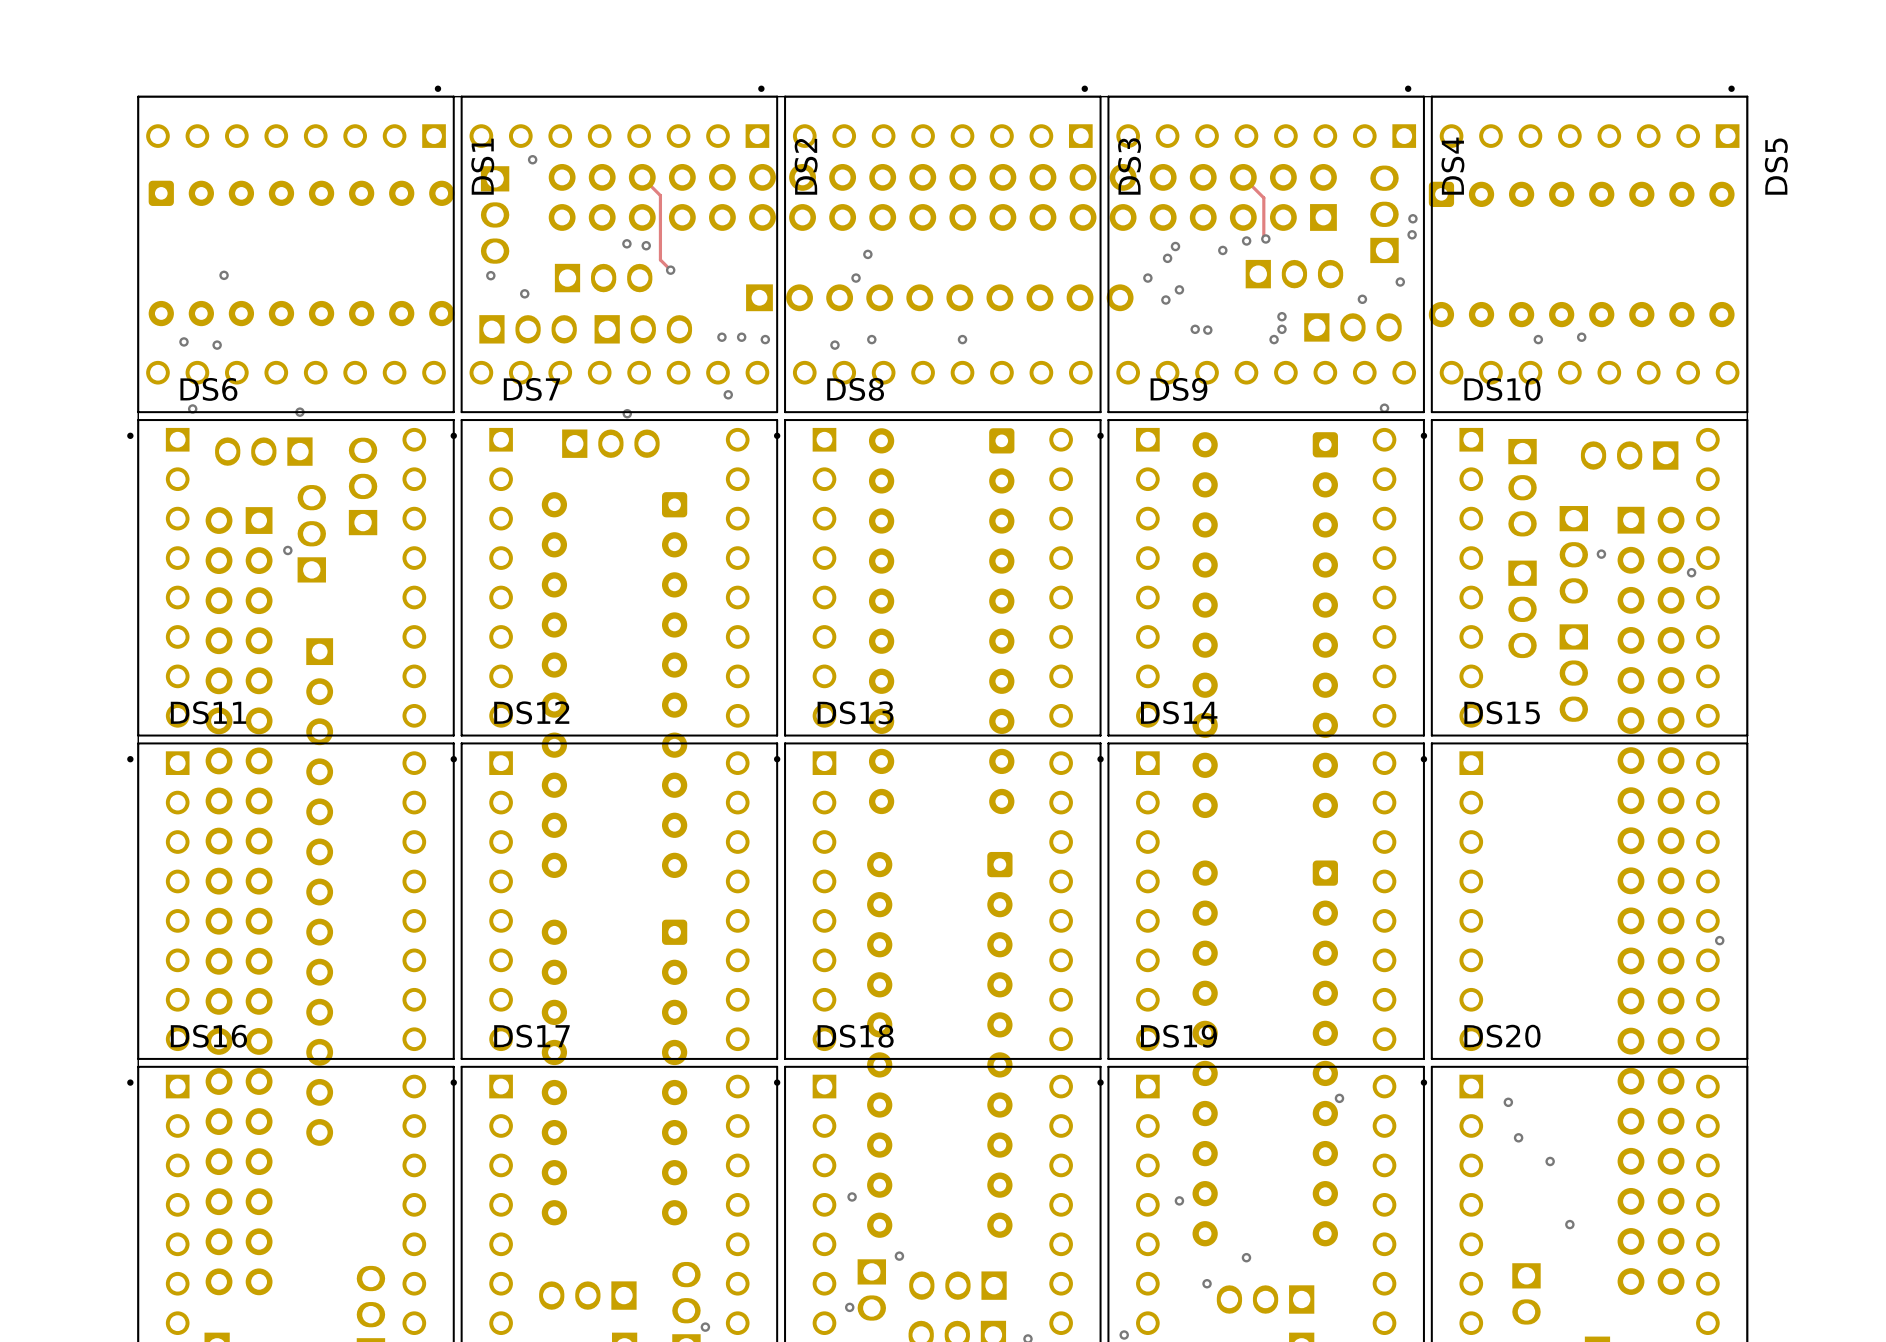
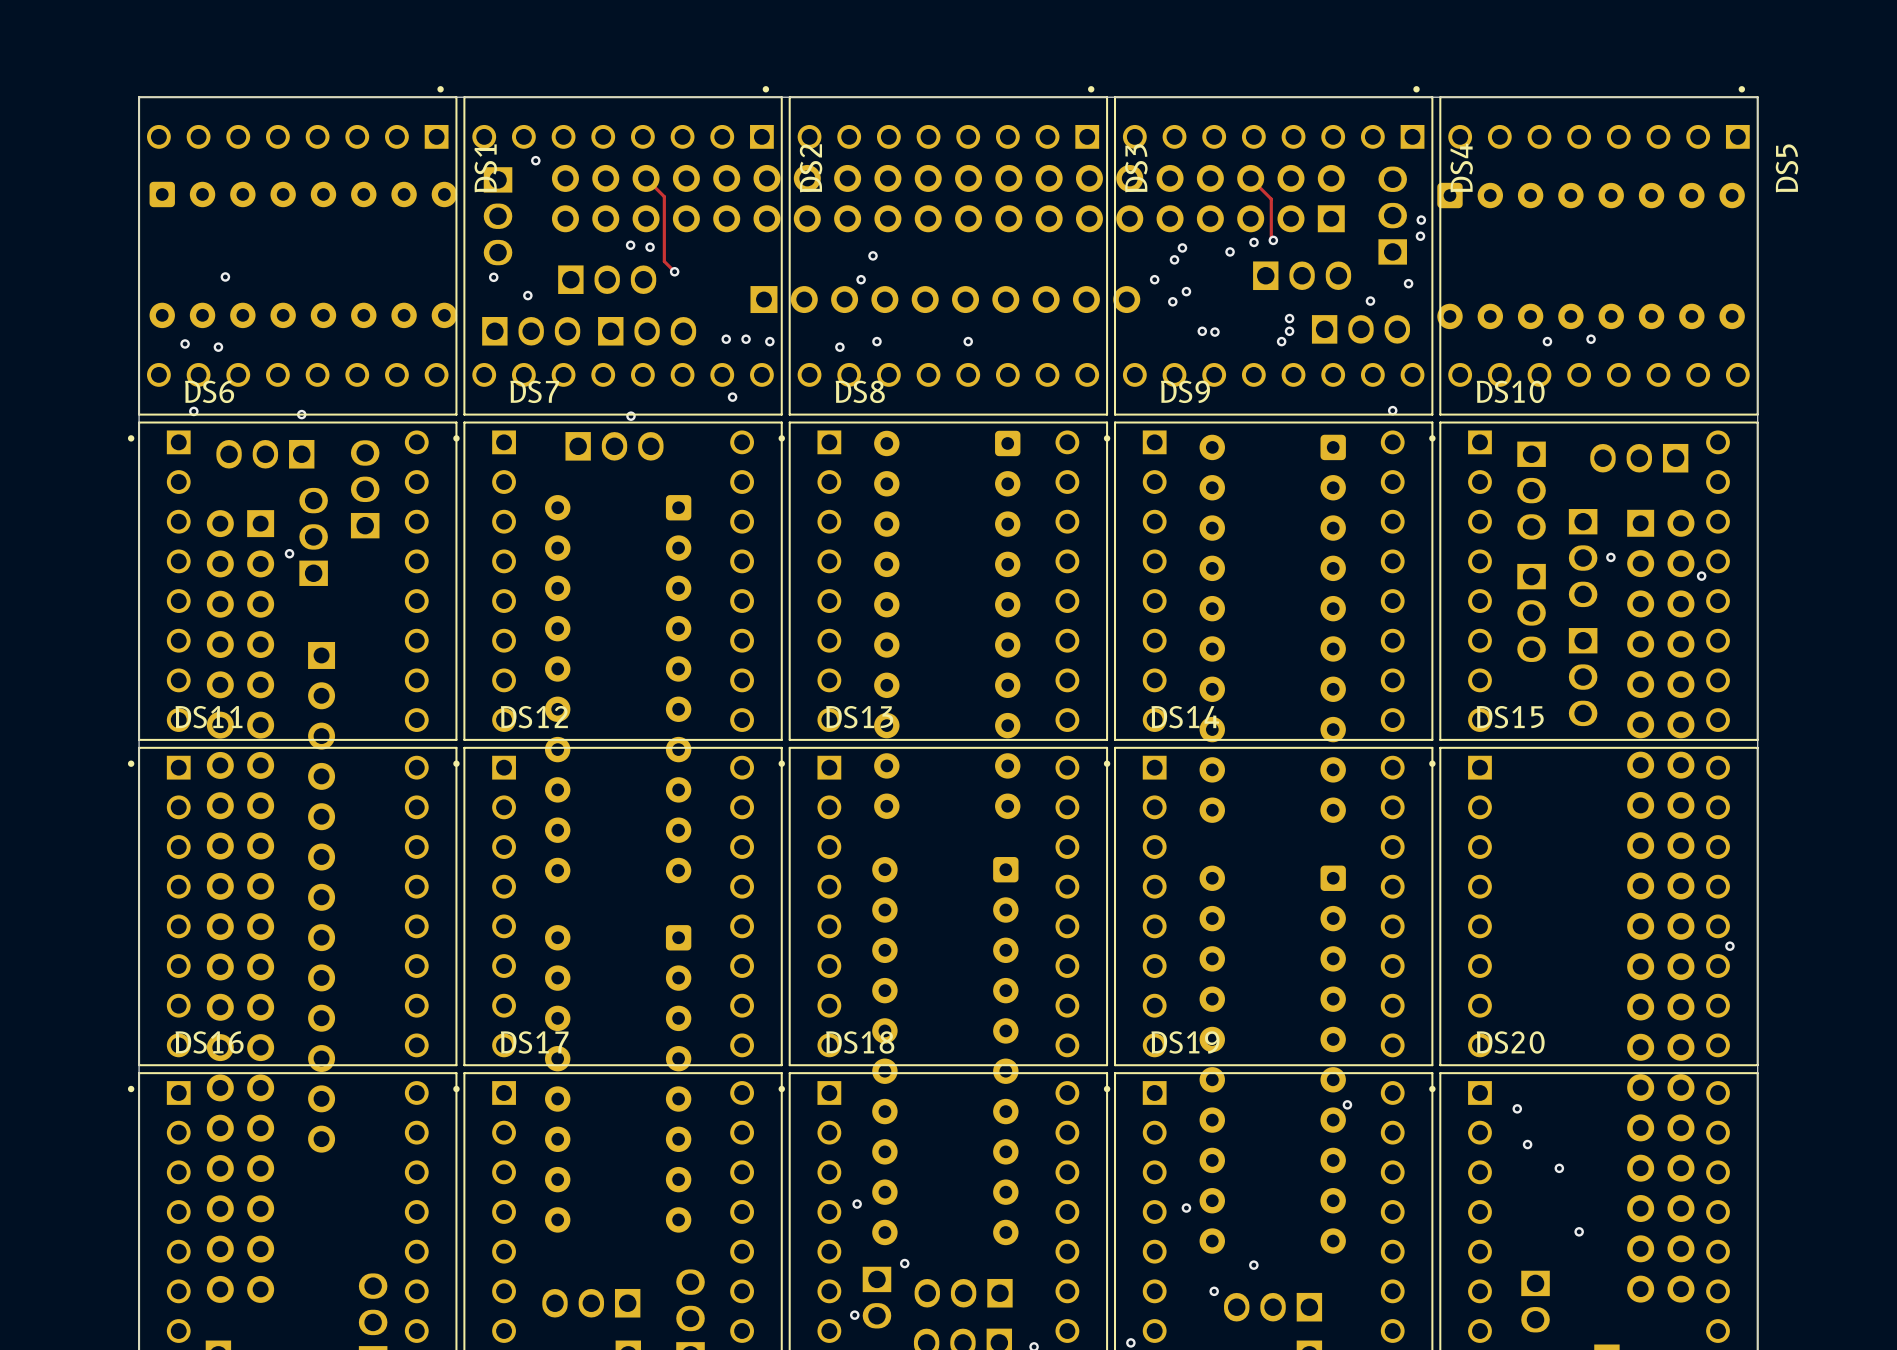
via: (705, 1327) -> none

